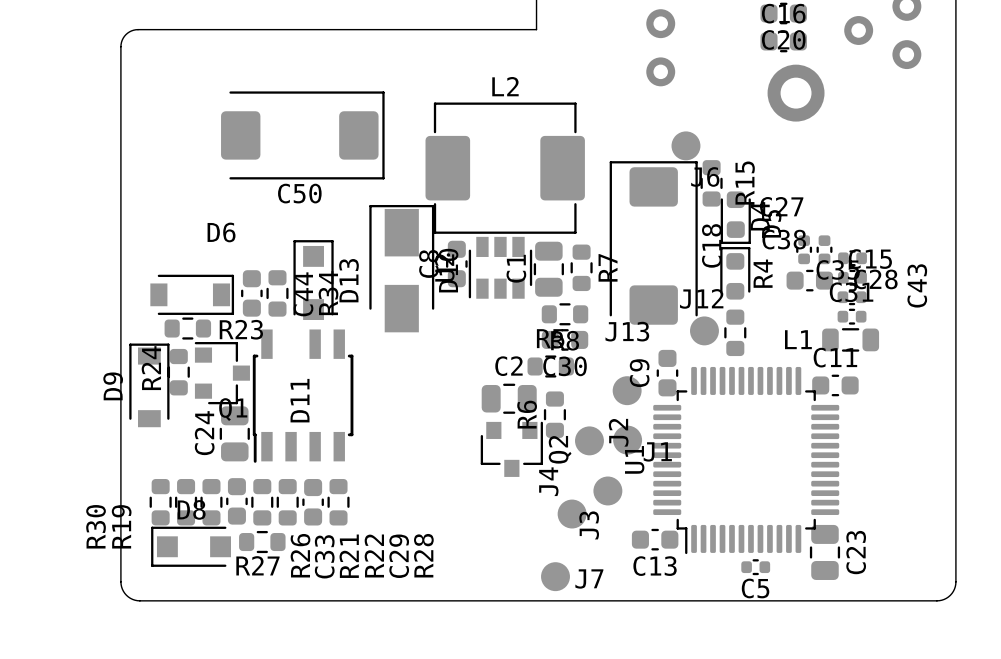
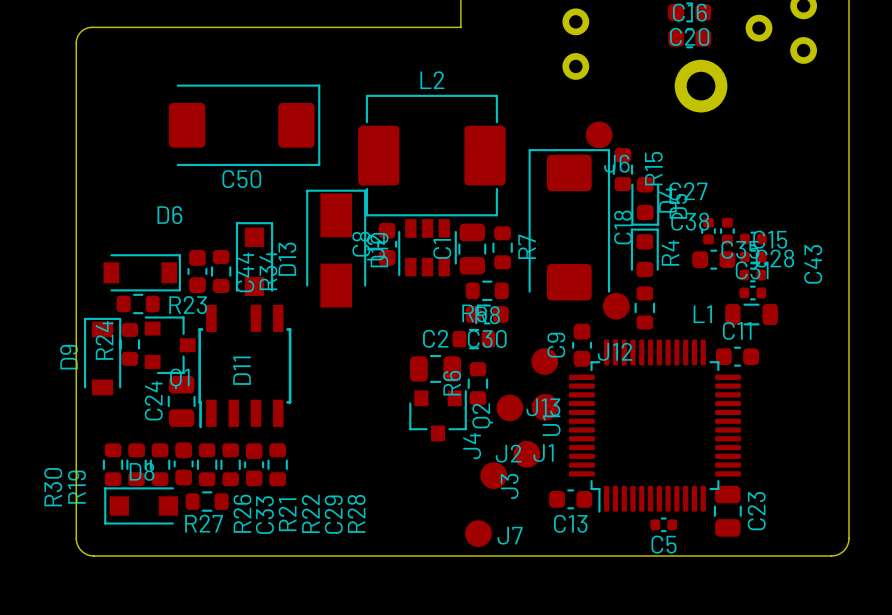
J12 name position: J12 (701, 298) -> J12 (615, 351)
J13 name position: J13 (627, 331) -> J13 (543, 407)
J2 name rotation: 0° (618, 432) -> 90° clockwise (508, 453)
J2 name position: J2 (618, 432) -> J2 (508, 453)
J1 name position: J1 (657, 451) -> J1 (543, 453)

